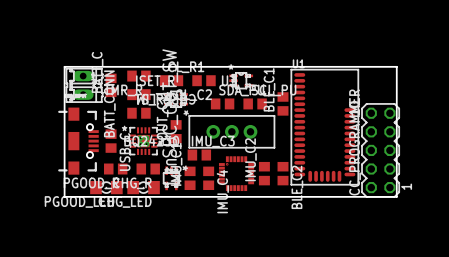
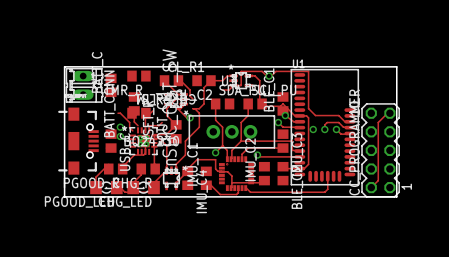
track: none -> (233, 75) (227, 76) (222, 80) (210, 80) (204, 87) (204, 103) (199, 108) (193, 108)
track: none -> (248, 75) (254, 75) (259, 80) (259, 101) (264, 106) (280, 106) (283, 103) (294, 115) (306, 115) (308, 117) (308, 164) (303, 169) (284, 168) (283, 166)
via: none -> (269, 76)
track: none -> (164, 80) (178, 94) (185, 94) (185, 103) (177, 108) (186, 117) (190, 117)
track: none -> (178, 80) (190, 90) (190, 96) (193, 99)
track: none -> (222, 90) (229, 90) (233, 85) (241, 85) (241, 71) (262, 71) (266, 76) (271, 76) (276, 71) (308, 71) (308, 108) (315, 115) (338, 115) (344, 121) (349, 121)
ISET_R rotation: 0° (138, 94) -> 90° clockwise (134, 103)
track: none -> (176, 99) (166, 108) (166, 115) (176, 124) (166, 134) (154, 134) (154, 138) (159, 138) (166, 145) (166, 170) (152, 184) (152, 192) (125, 192) (116, 182)
track: none -> (215, 103) (215, 120) (222, 127) (222, 145)
track: none -> (248, 103) (248, 115) (241, 122) (241, 141)
track: none -> (194, 108) (199, 113) (199, 127) (185, 141) (185, 155) (176, 164) (176, 170)
track: none -> (134, 110) (134, 121) (138, 125)
track: none -> (152, 110) (145, 118) (145, 125)
track: none -> (118, 113) (129, 122) (129, 127) (132, 130)
track: none -> (387, 113) (378, 122) (378, 180) (368, 187)
track: none -> (285, 115) (293, 121) (299, 121)
via: none -> (285, 115)
via: none -> (190, 117)
track: none -> (162, 122) (159, 125) (149, 125)
track: none -> (278, 122) (283, 127) (301, 127)
via: none -> (278, 122)
via: none -> (120, 127)
track: none -> (349, 127) (343, 127) (338, 122) (327, 122) (324, 129)
via: none -> (313, 129)
via: none -> (324, 129)
track: none -> (336, 129) (341, 134) (349, 133)
via: none -> (336, 129)
via: none -> (120, 136)
track: none -> (241, 141) (231, 150) (231, 159)
track: none -> (241, 141) (292, 141) (292, 150) (299, 151)
track: none -> (154, 142) (155, 164)
track: none -> (222, 145) (227, 150) (227, 159)
track: none -> (222, 145) (215, 152)
track: none -> (145, 147) (143, 155) (134, 155) (122, 164)
track: none -> (283, 148) (248, 148) (242, 154) (242, 159)
via: none -> (215, 152)
IMU_C3 rotation: 0° (199, 155) -> 90° clockwise (283, 141)
IMU_C3 position: (199, 155) -> (283, 141)
track: none -> (257, 155) (259, 156) (299, 156)
via: none -> (257, 155)
track: none -> (108, 164) (96, 177) (96, 182)
track: none -> (141, 164) (141, 174) (133, 182)
track: none -> (327, 176) (327, 189) (324, 192) (250, 192) (245, 188)
IMU_C1 position: (190, 178) -> (206, 178)
IMU_C4 position: (208, 178) -> (187, 178)
track: none -> (264, 180) (262, 182) (231, 182)
track: none -> (176, 185) (176, 182) (197, 159) (215, 159) (215, 169) (217, 171) (227, 171) (231, 175) (231, 188)
track: none -> (206, 185) (210, 185) (220, 194) (236, 194) (238, 188)

